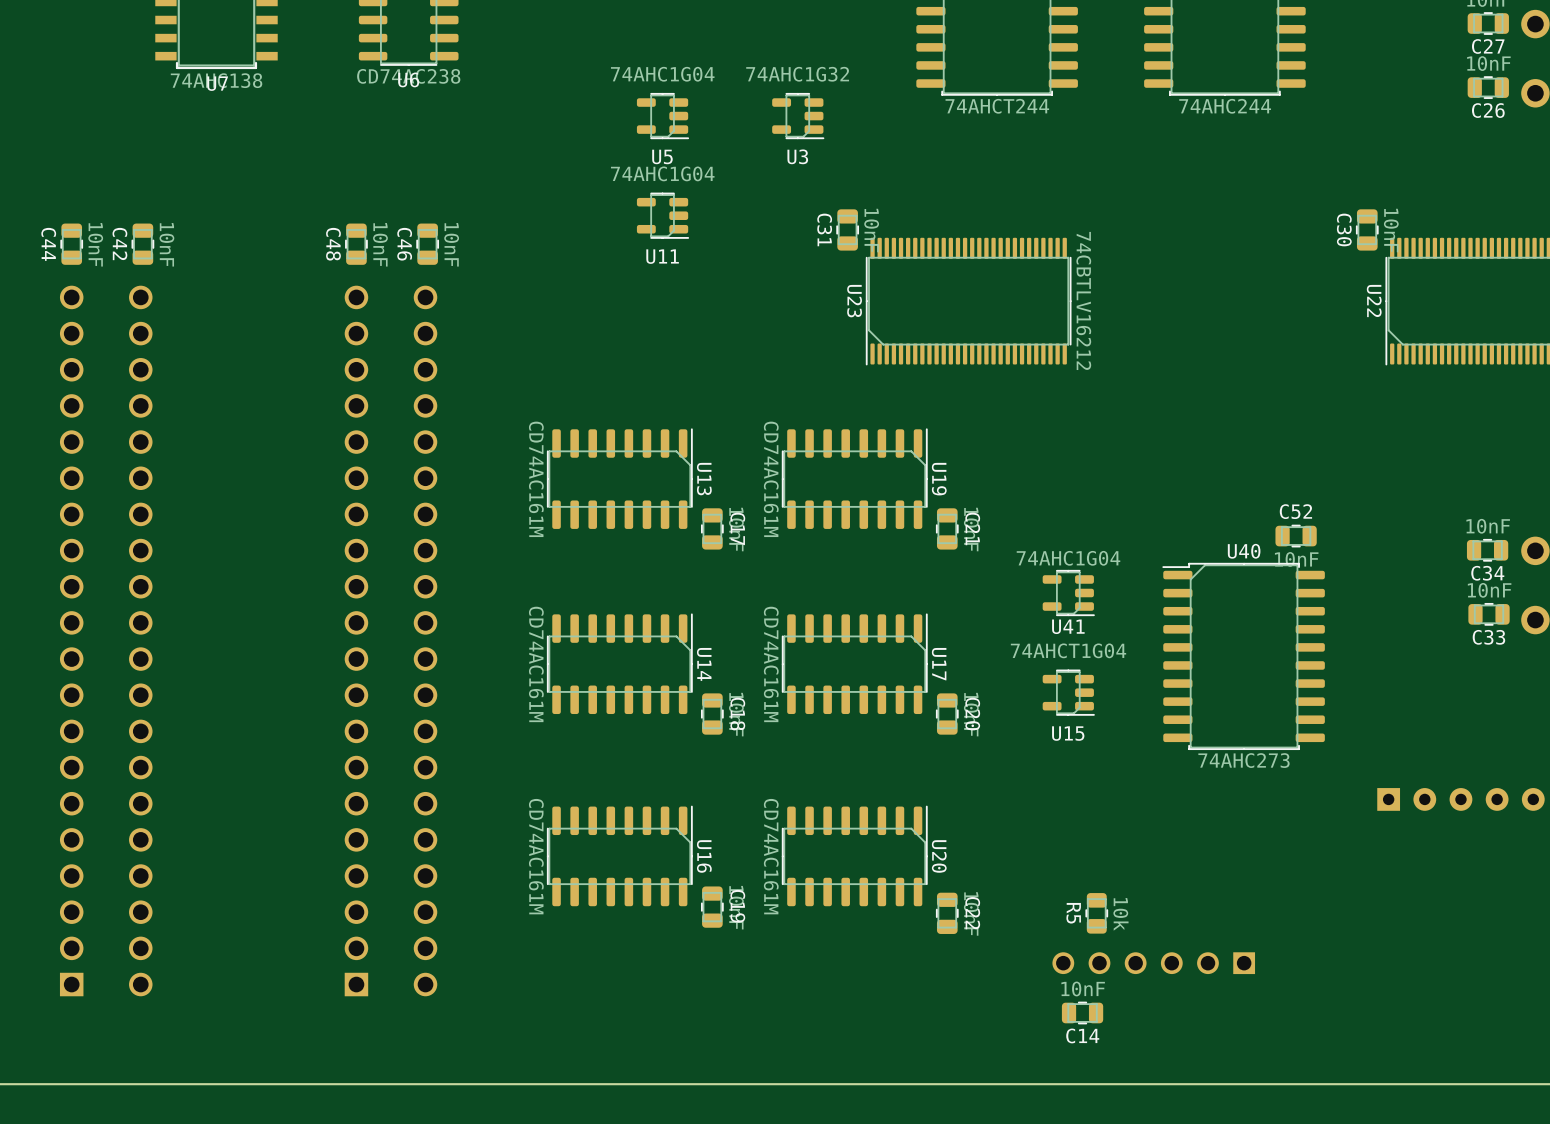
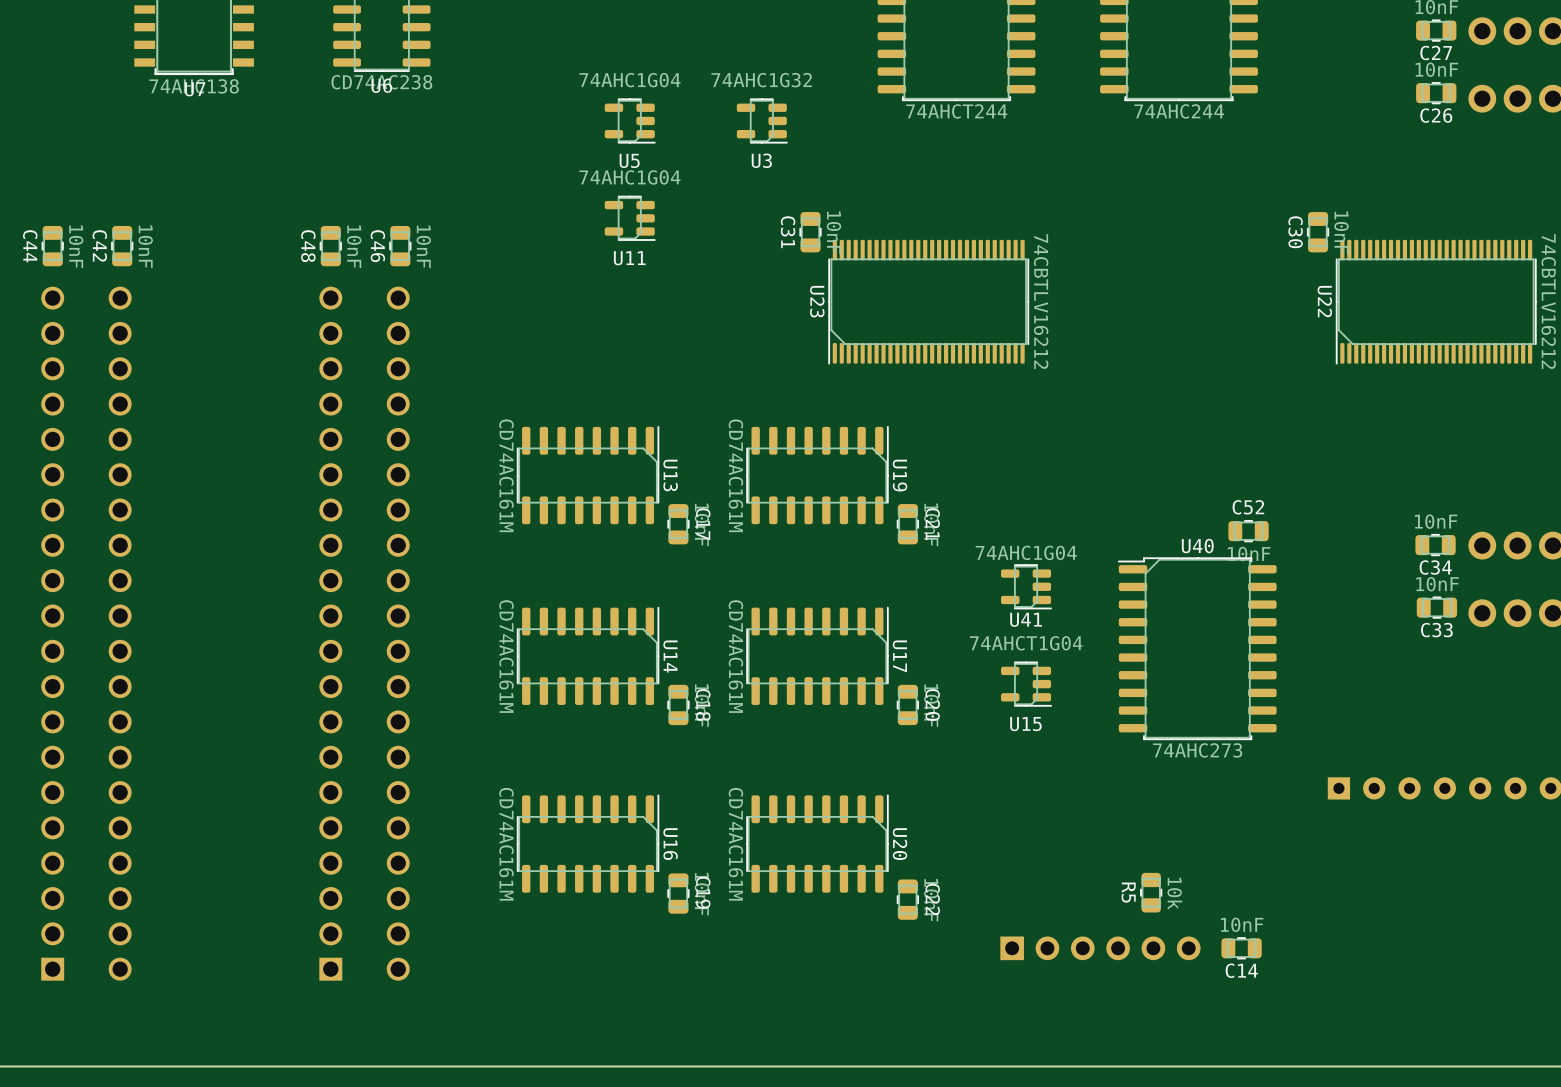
R5 position: (1096, 913) -> (1151, 892)
part footprint: [1052, 952, 1256, 975] -> [1000, 936, 1201, 961]
C14 position: (1082, 1013) -> (1241, 948)

